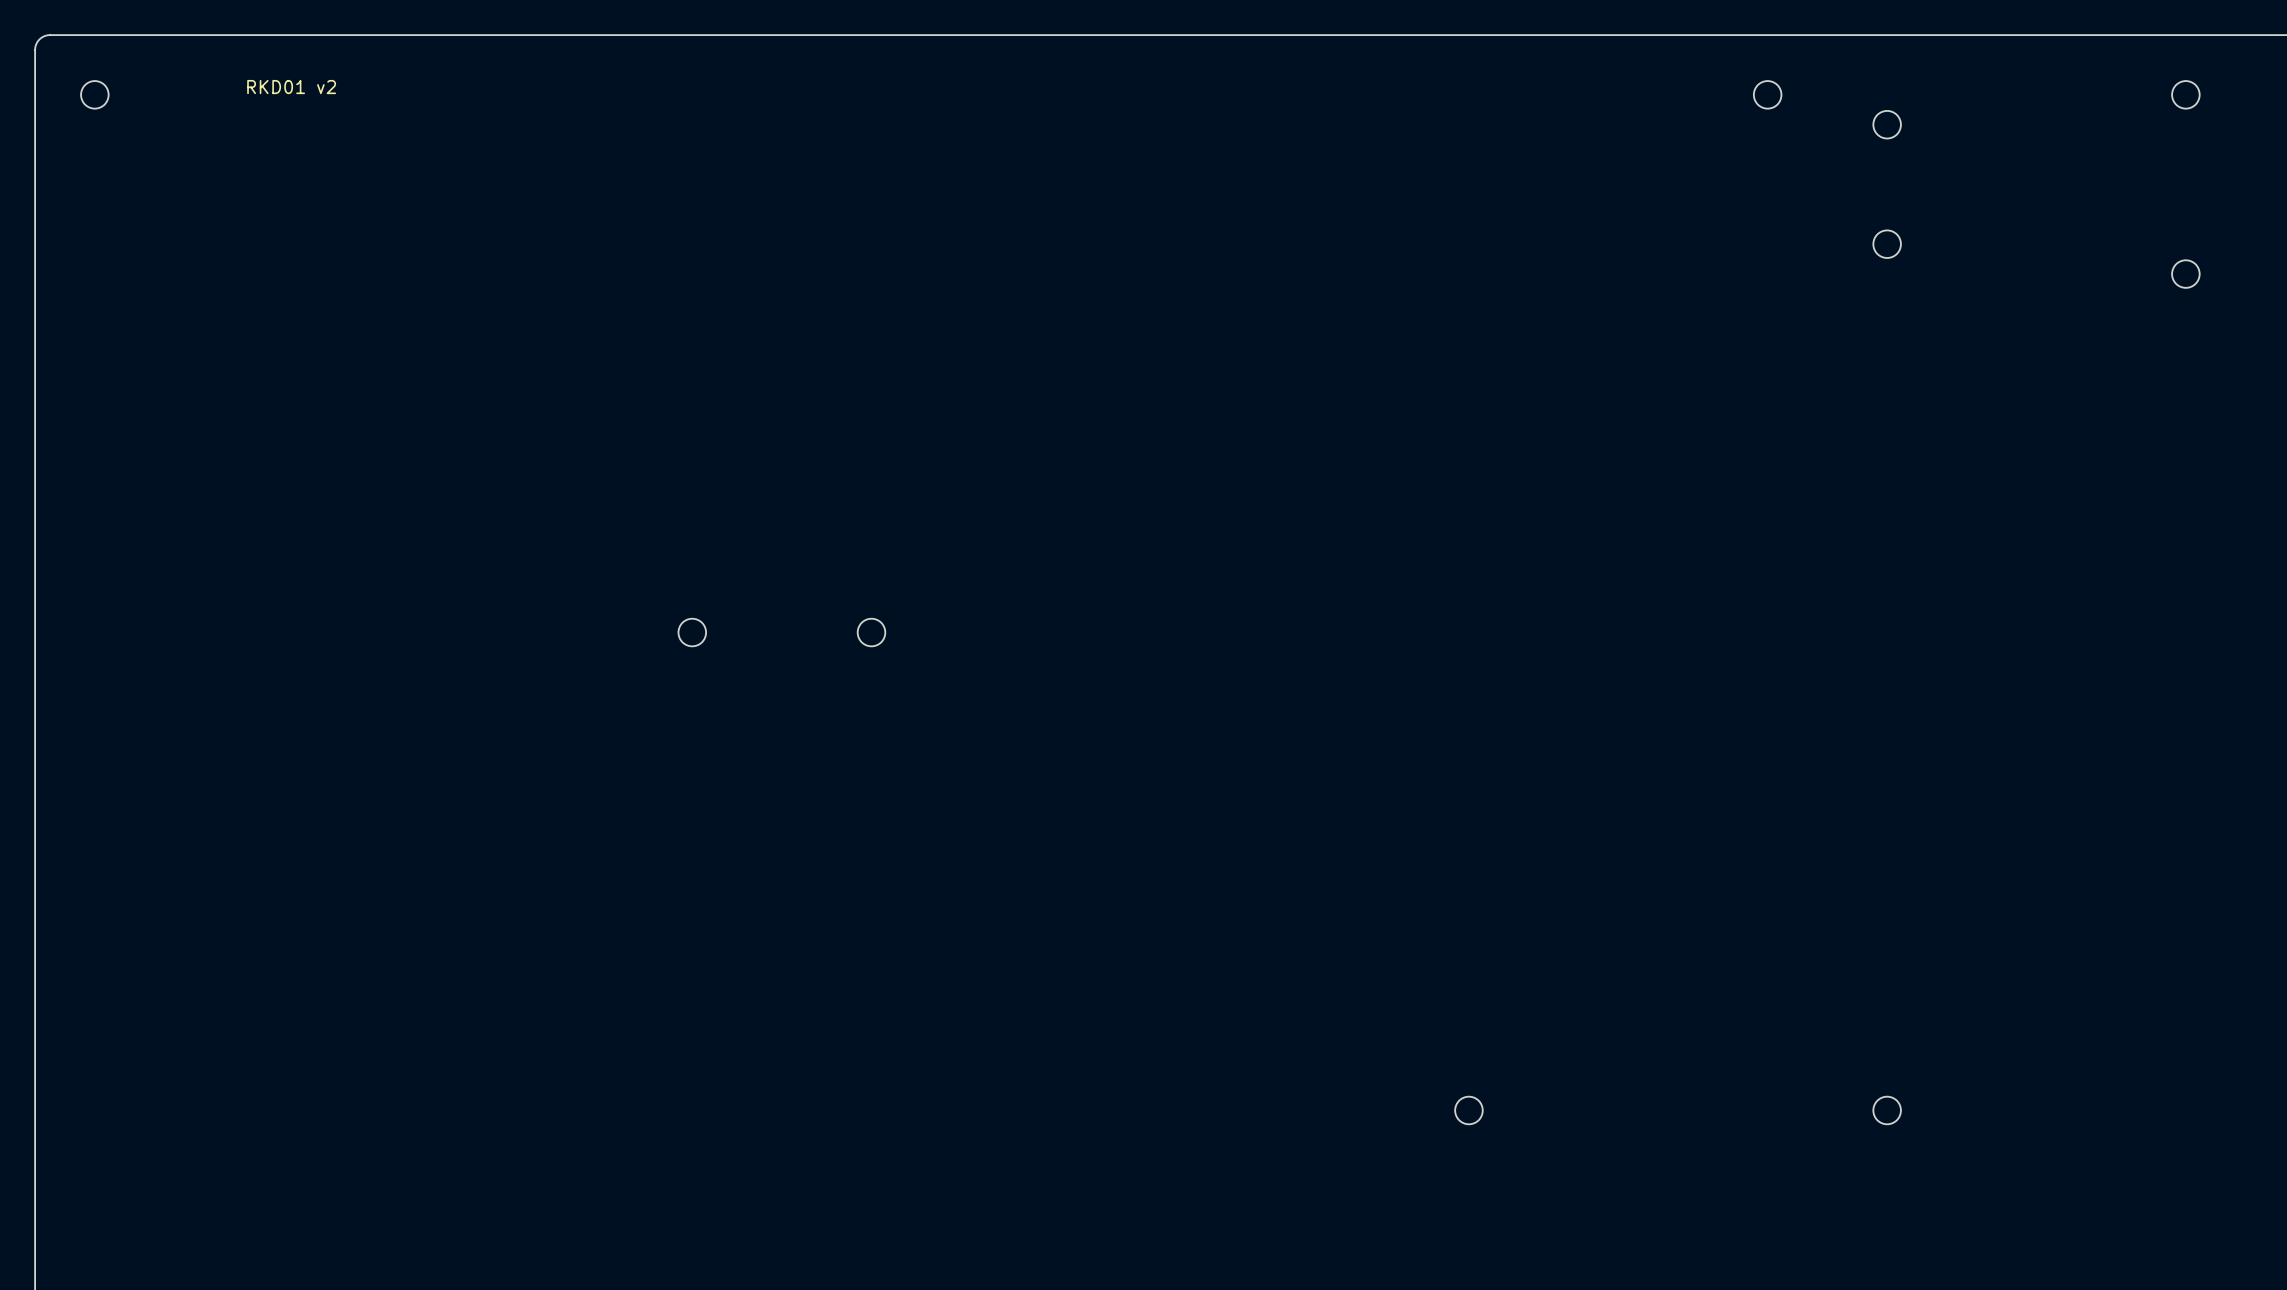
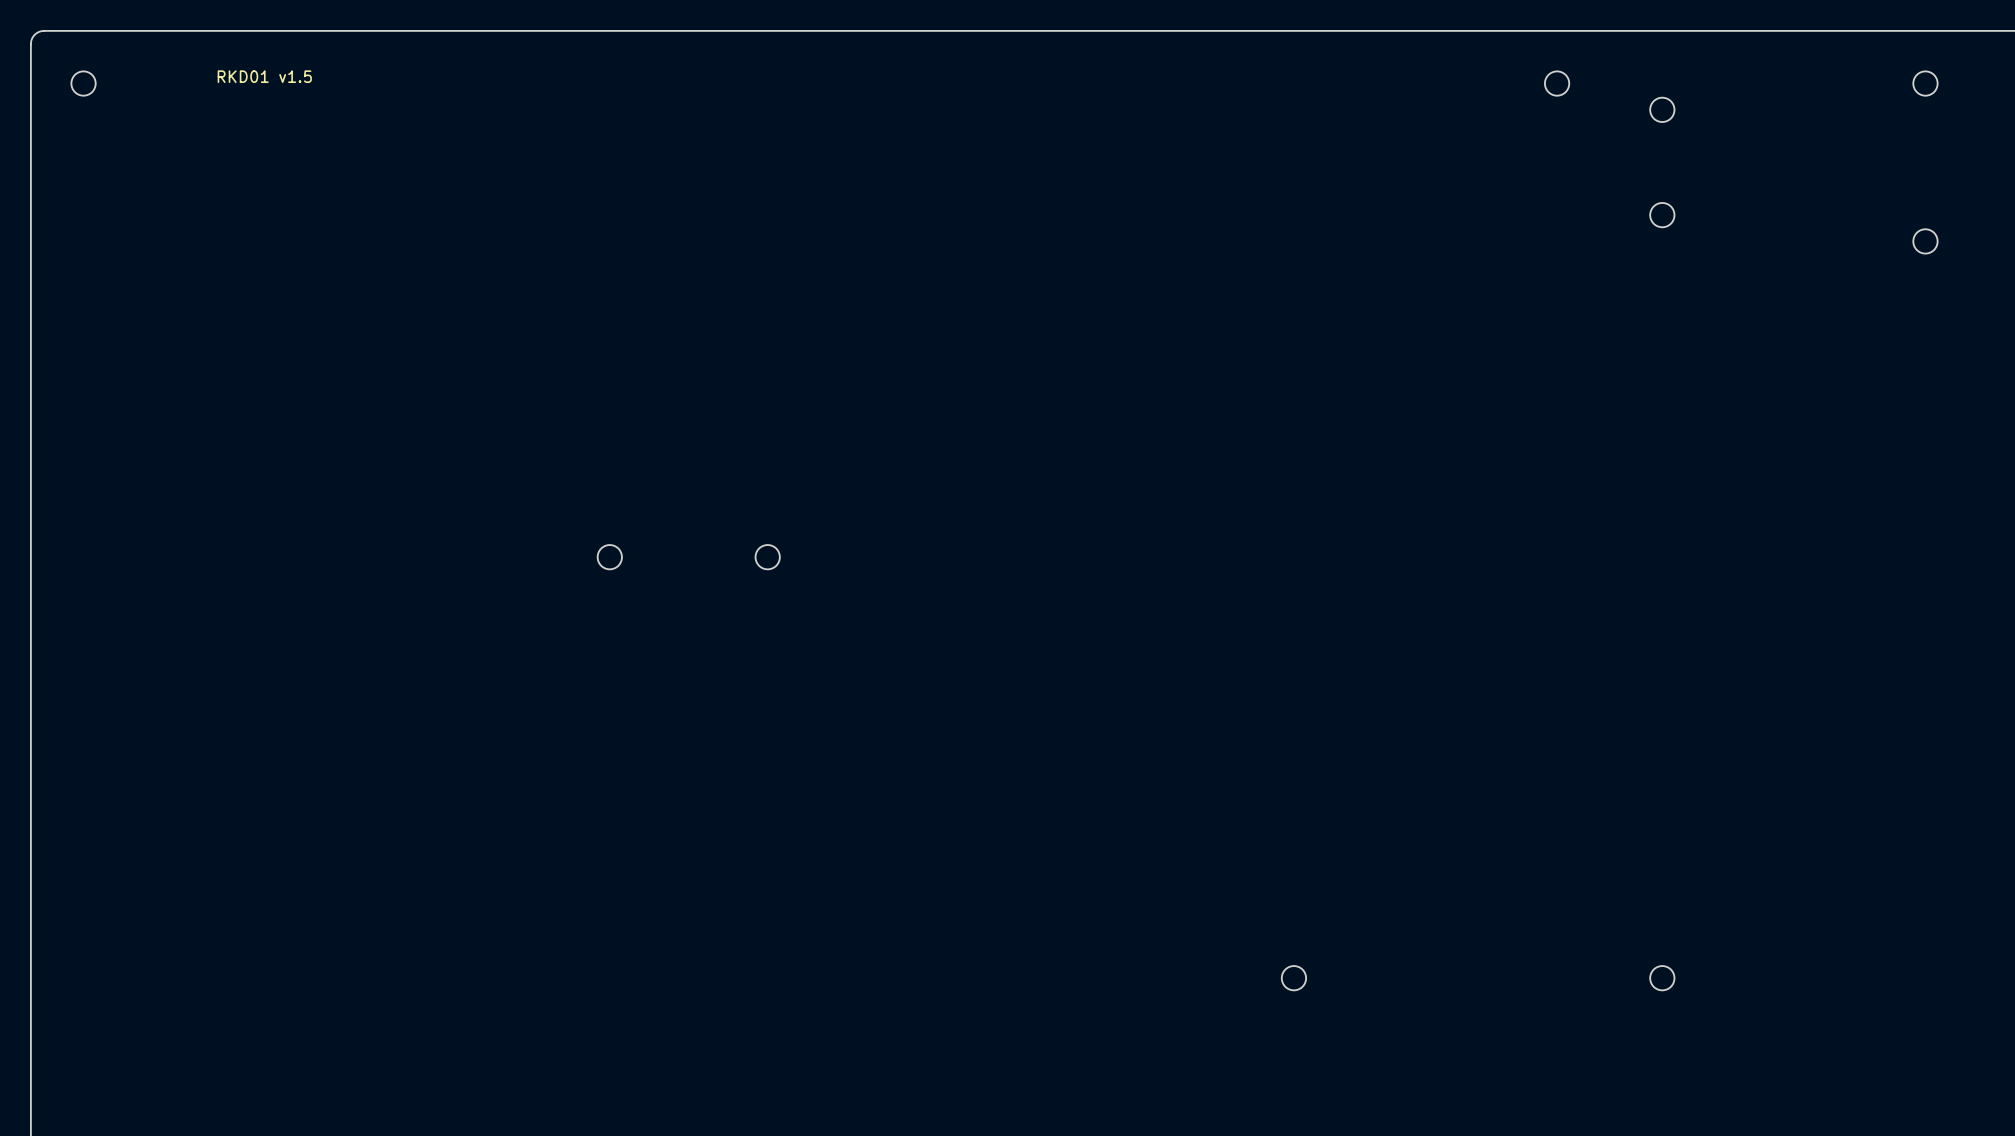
text: RKD01 v2 (291, 87) -> RKD01 v1.5 (264, 76)

